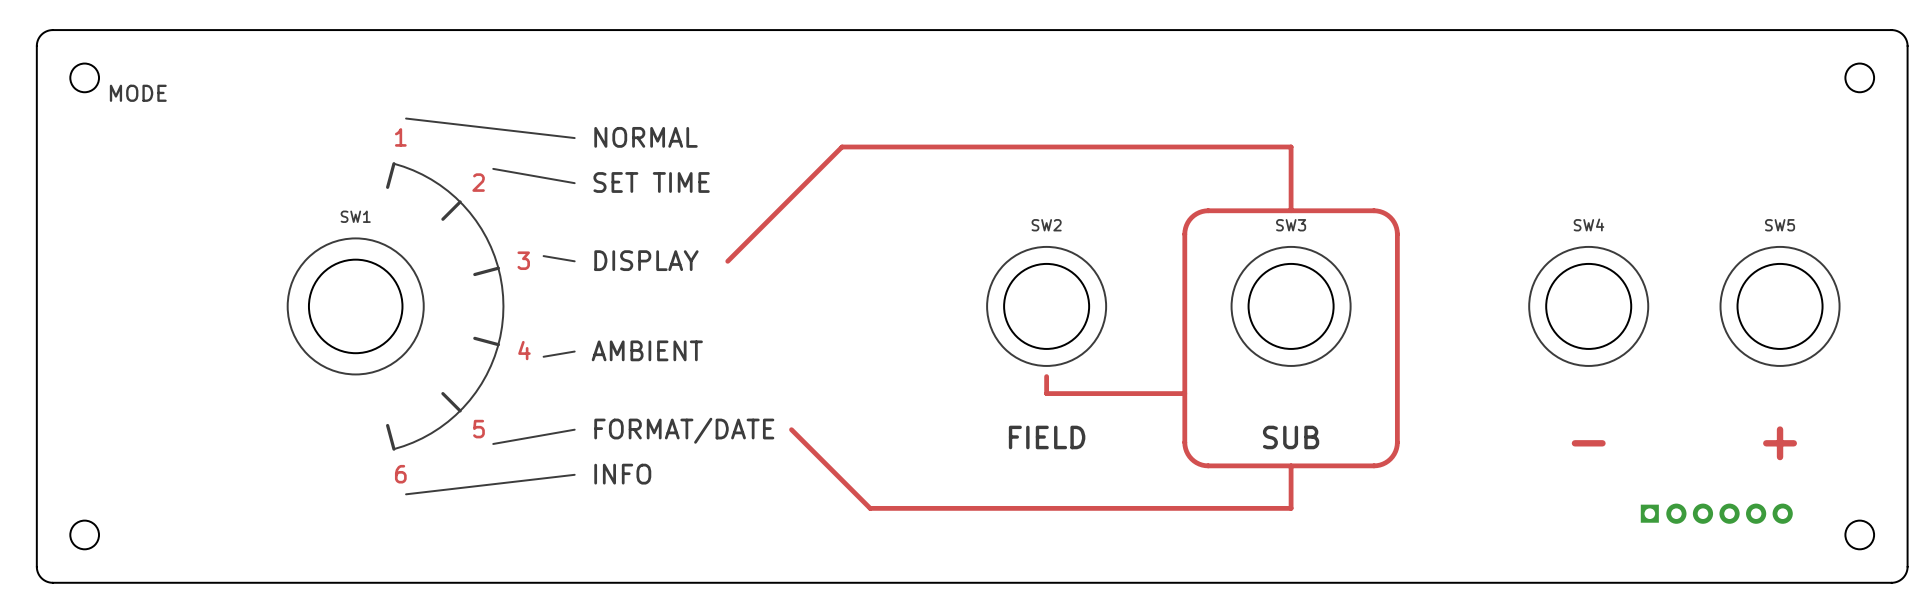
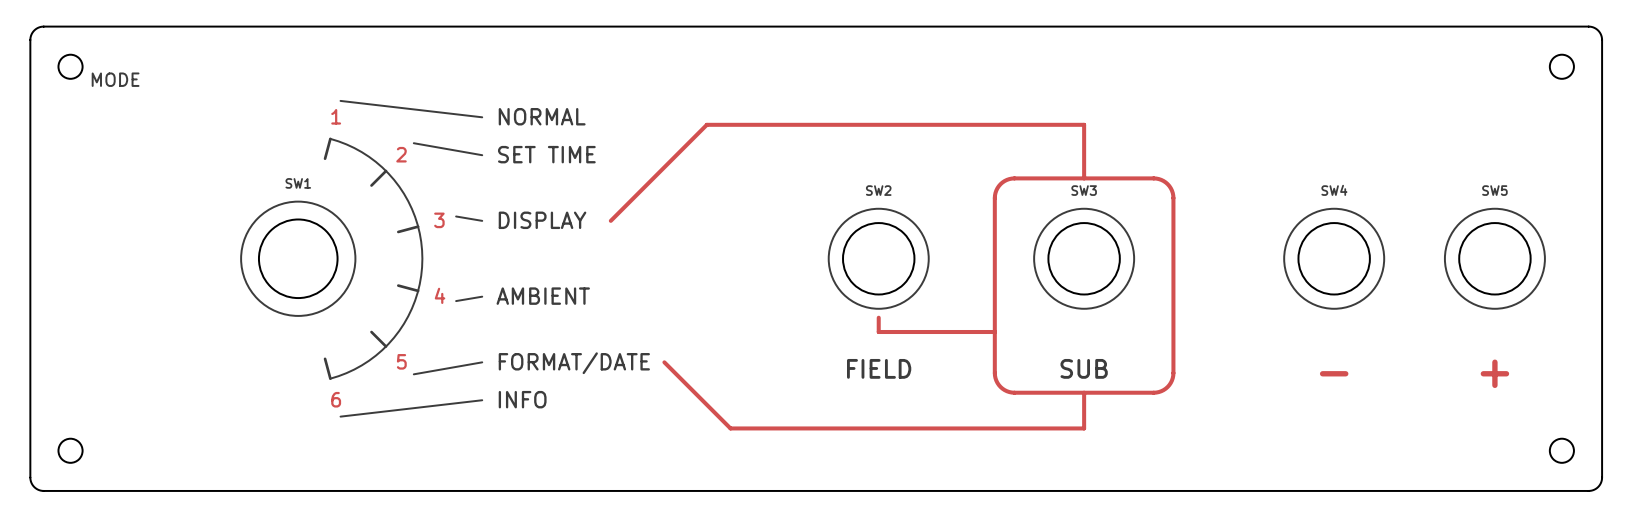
part: (1716, 513) -> none

